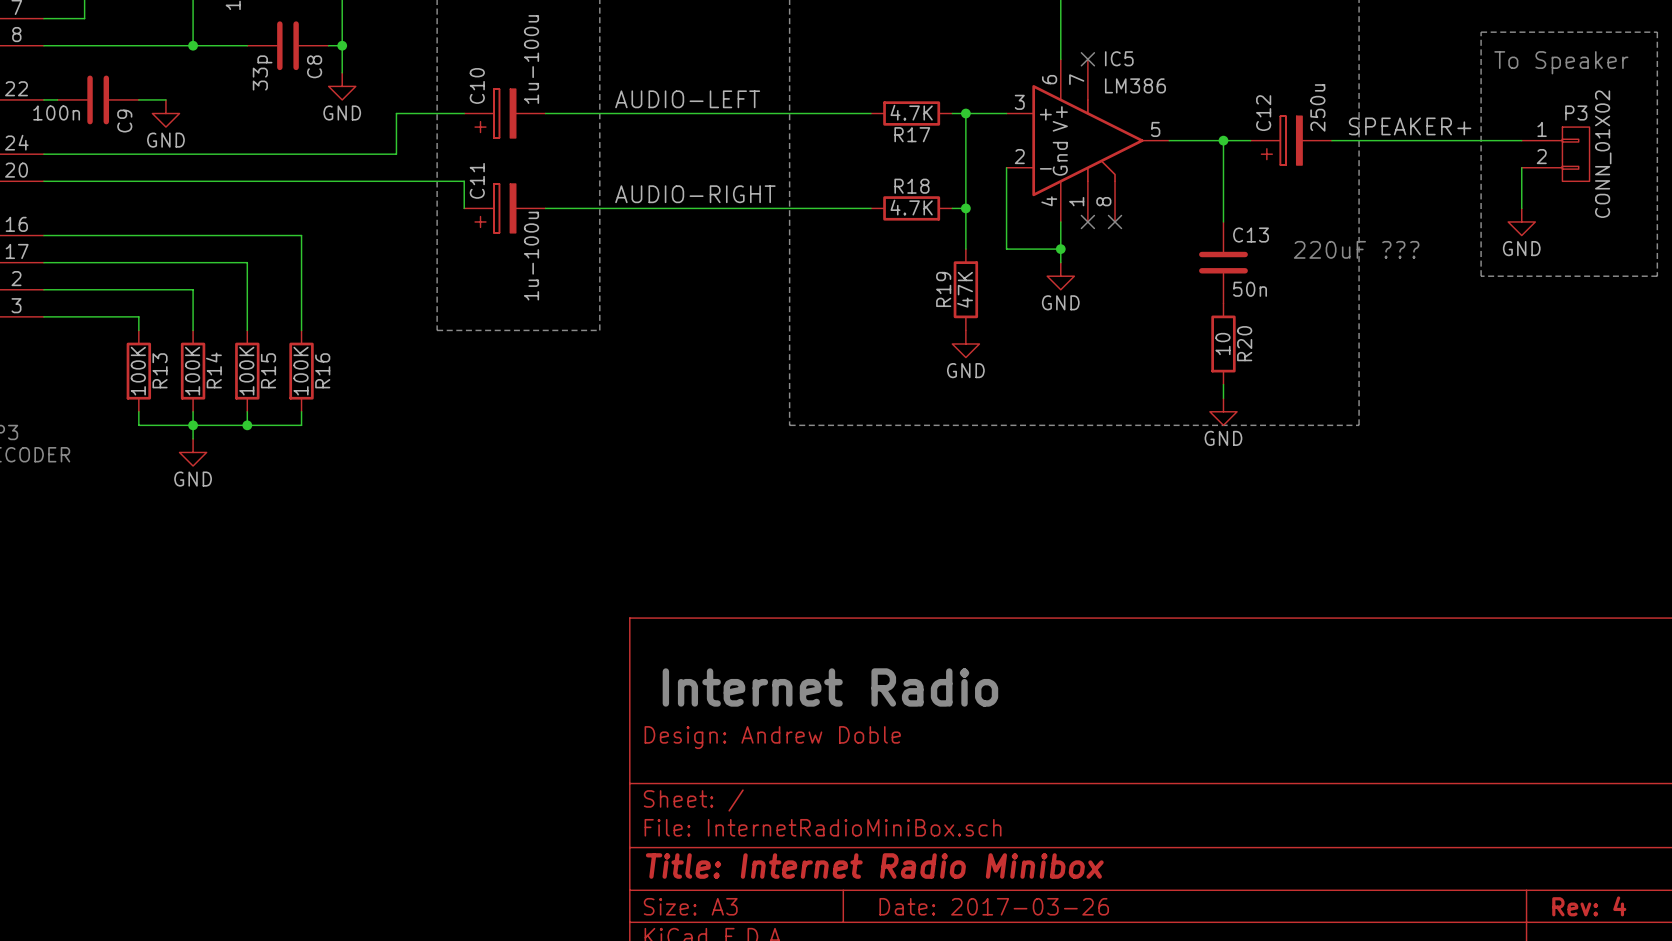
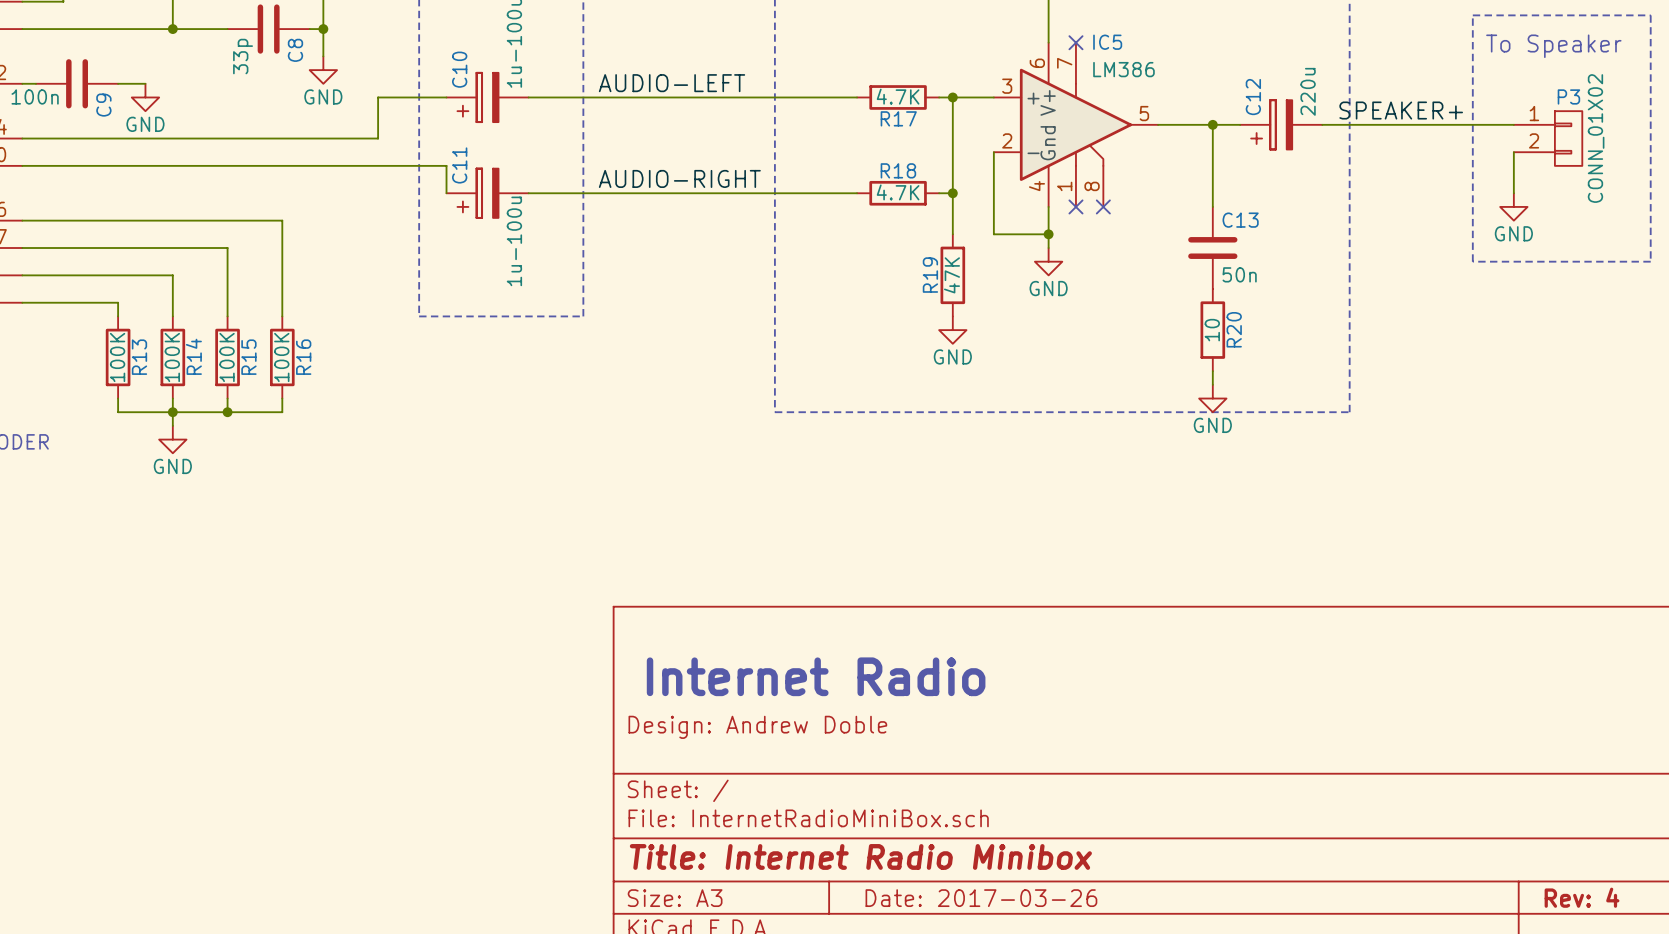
C12 value: 250u (1317, 107) -> 220u (1308, 91)
text: 220uF ??? (1356, 249) -> none

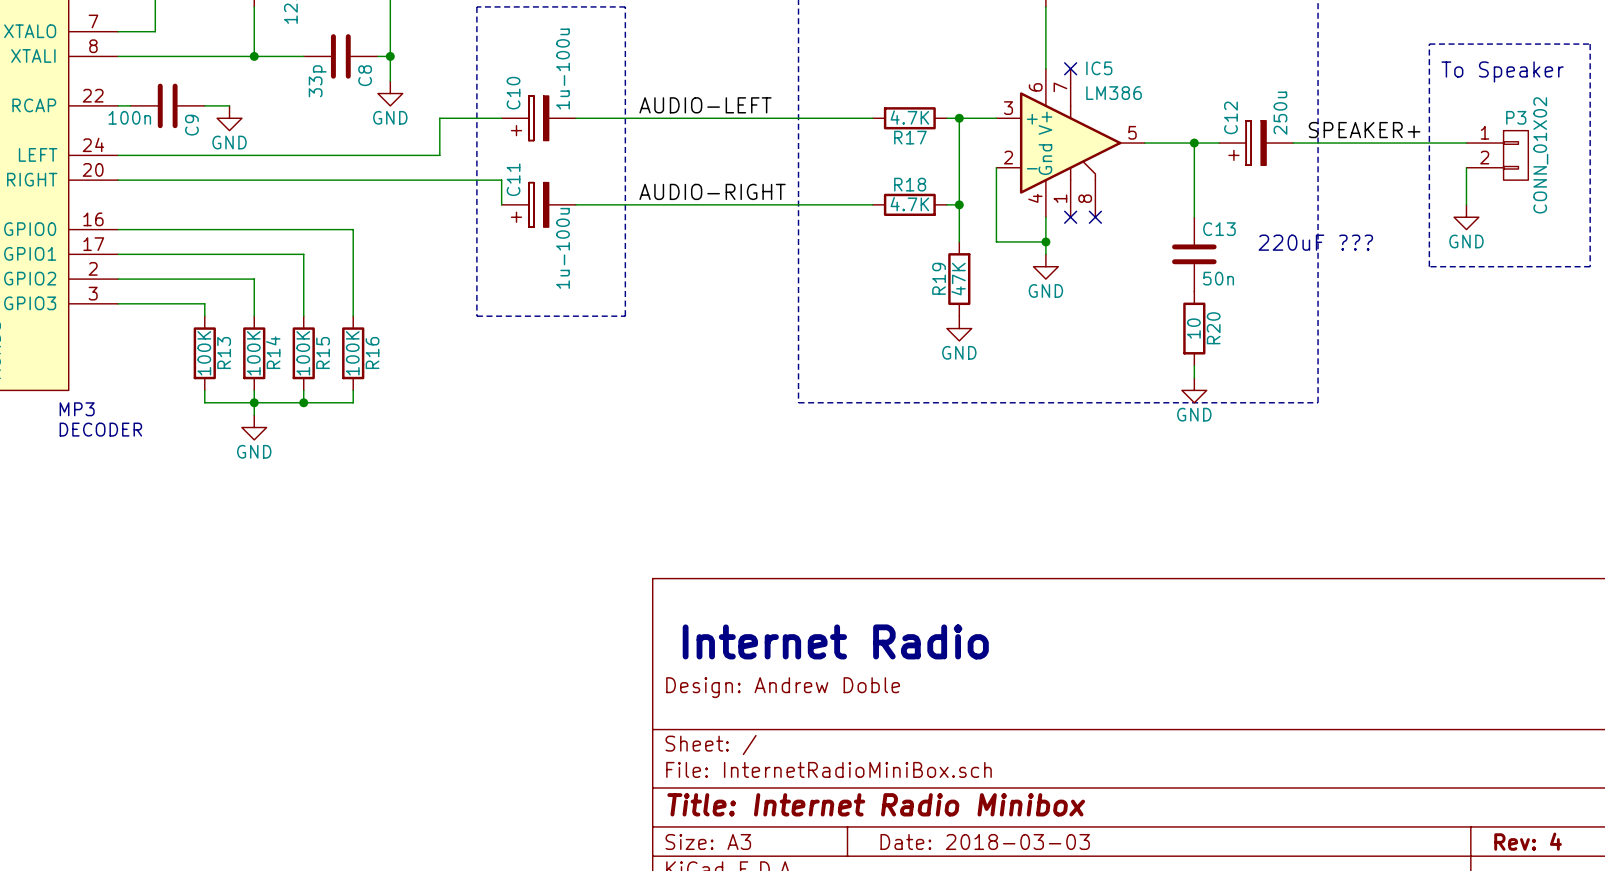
C12 value: 220u (1308, 91) -> 250u (1280, 113)
text: none -> 220uF ??? (1315, 242)
title block: Date: 2017-03-26 (981, 898) -> Date: 2018-03-03 (985, 842)

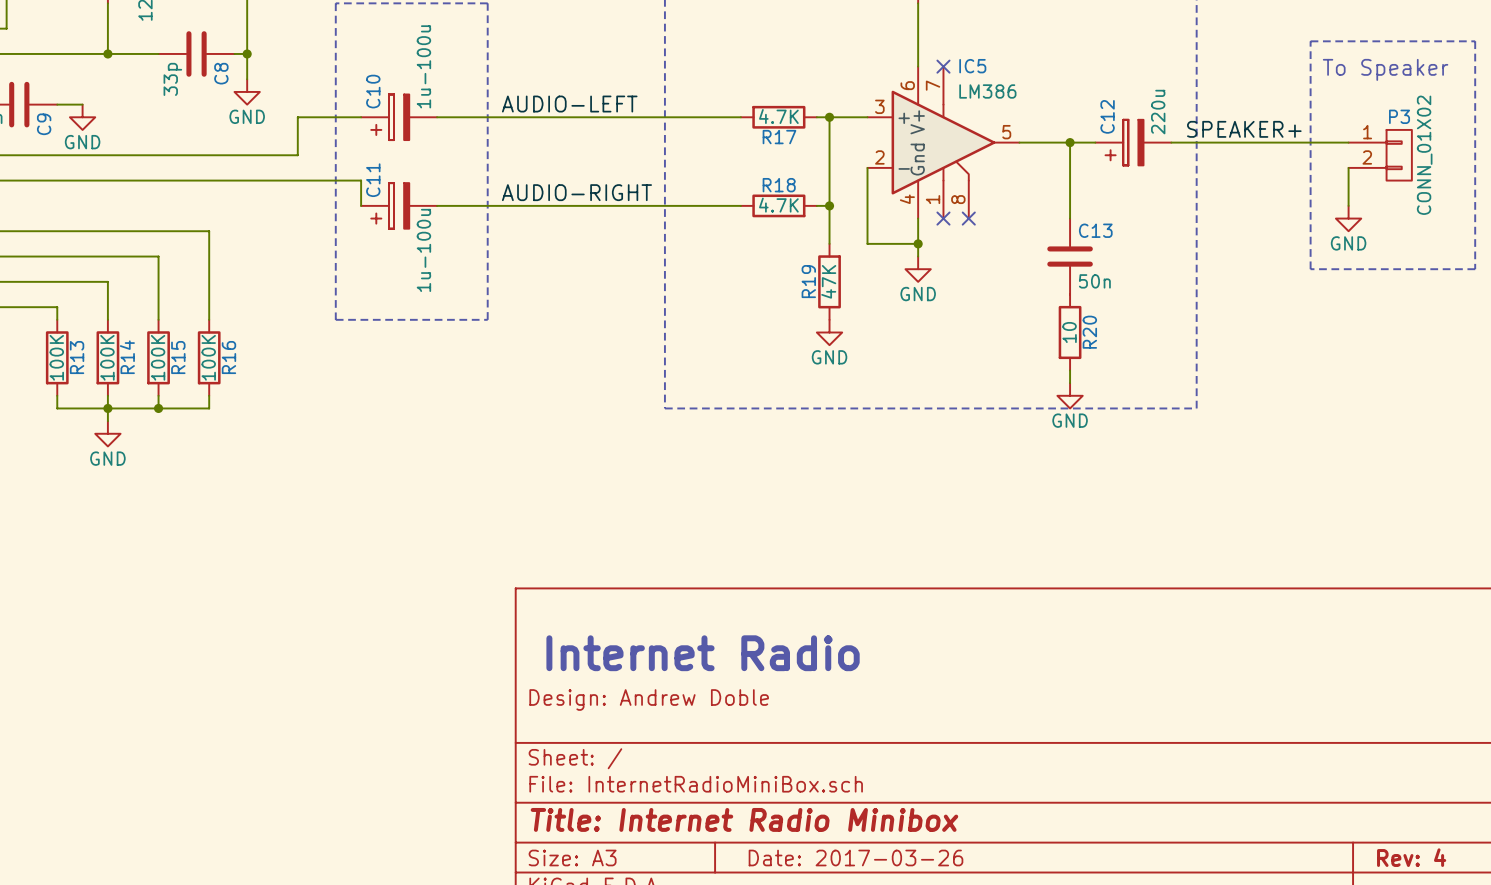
C12 value: 250u (1280, 113) -> 220u (1158, 112)
text: 220uF ??? (1315, 242) -> none
title block: Date: 2018-03-03 (985, 842) -> Date: 2017-03-26 (855, 857)

